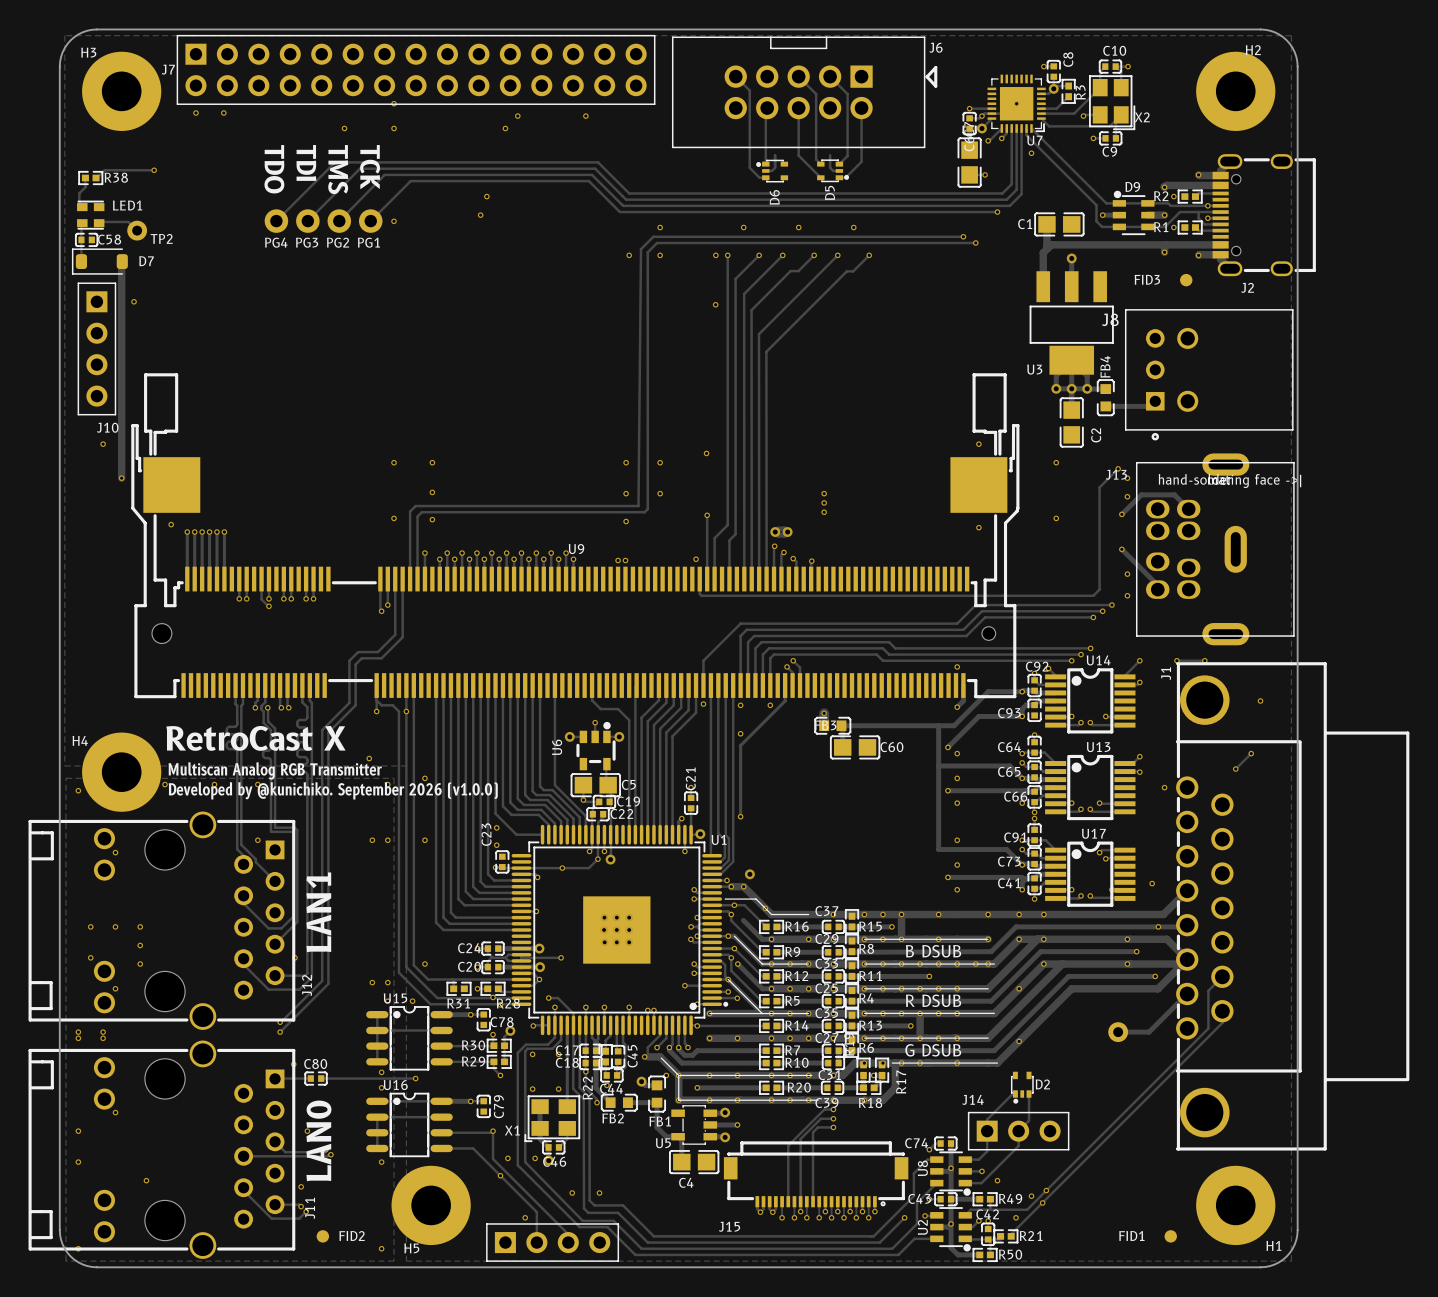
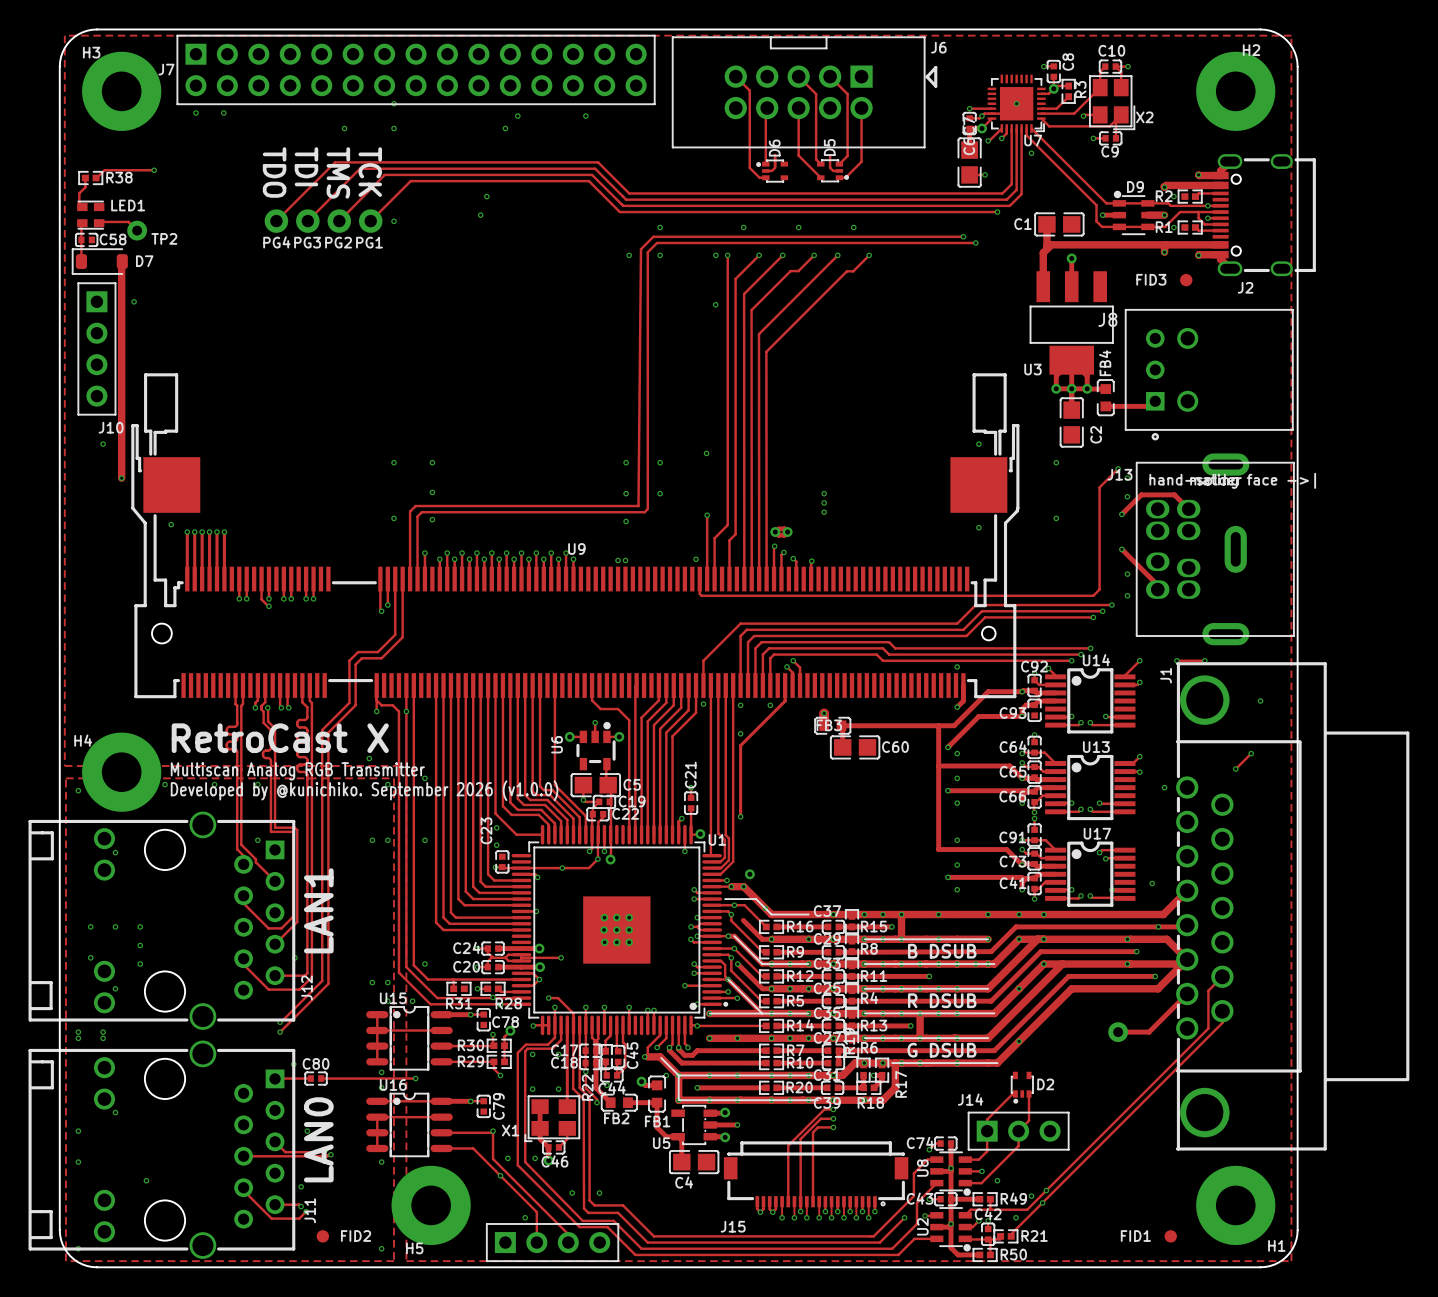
D5 name position: D5 (830, 192) -> D5 (829, 147)
D6 name position: D6 (774, 197) -> D6 (774, 148)

